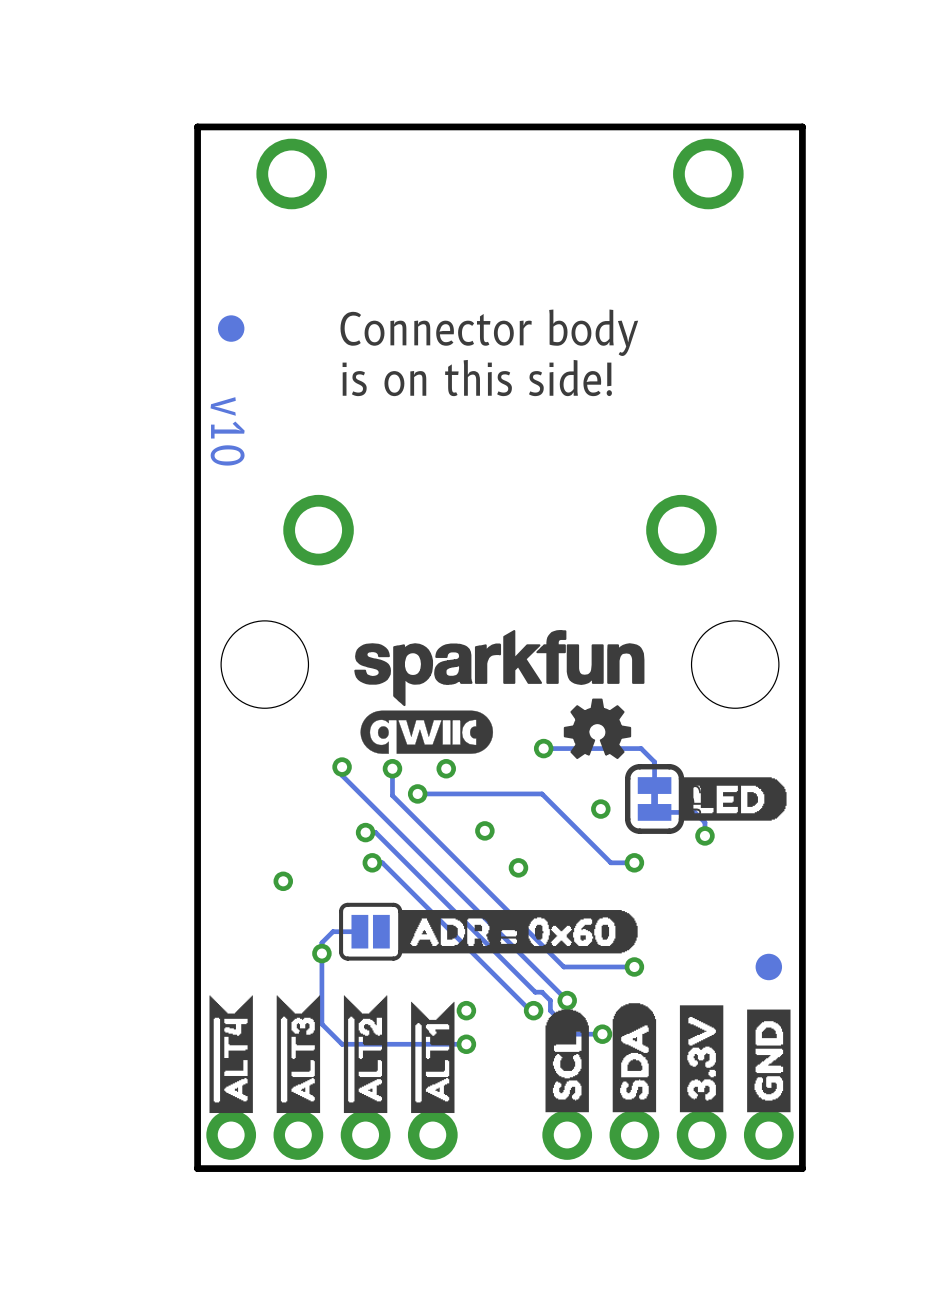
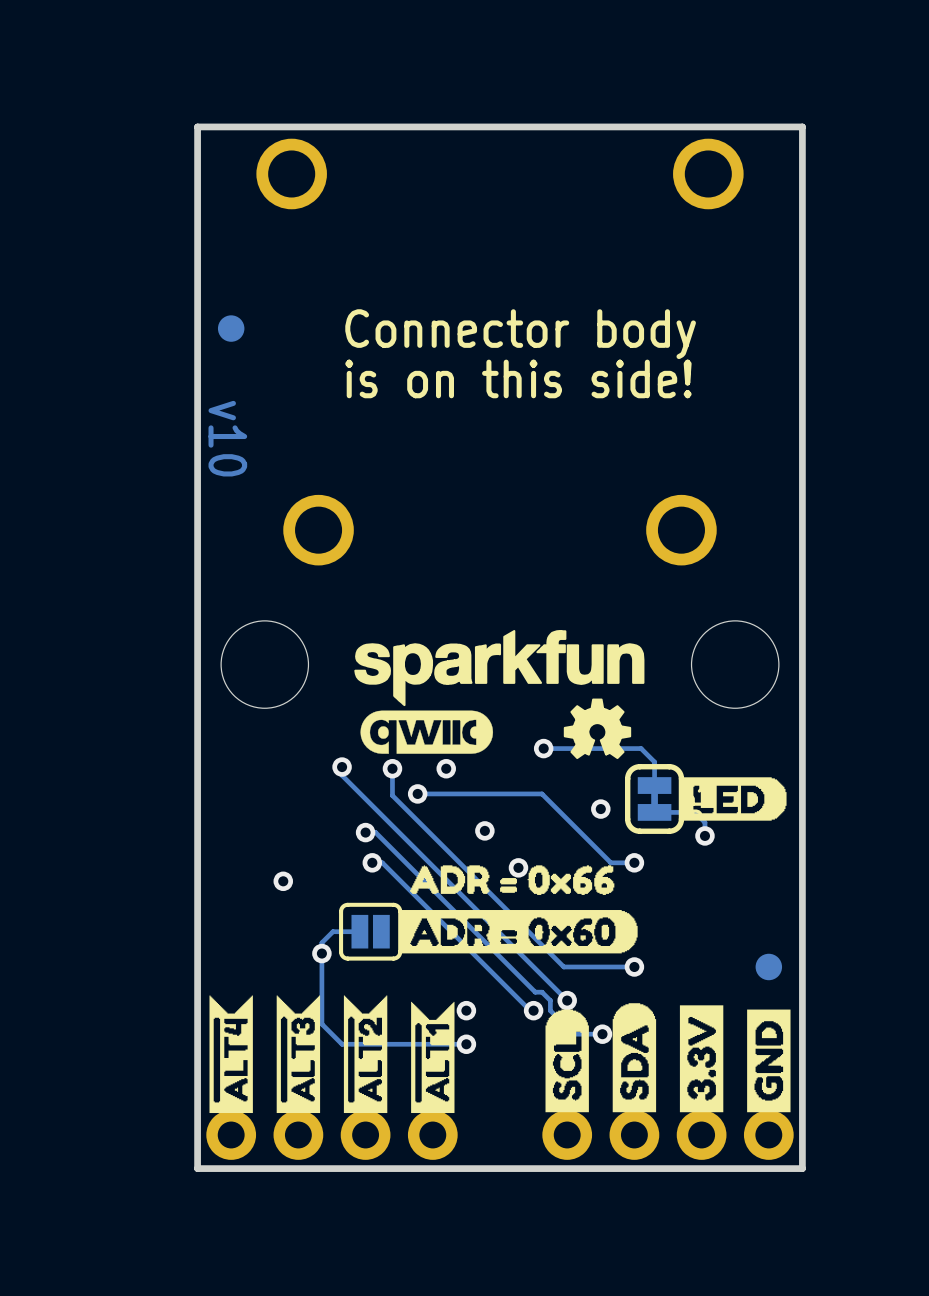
drawing: none -> [410, 865, 615, 895]

